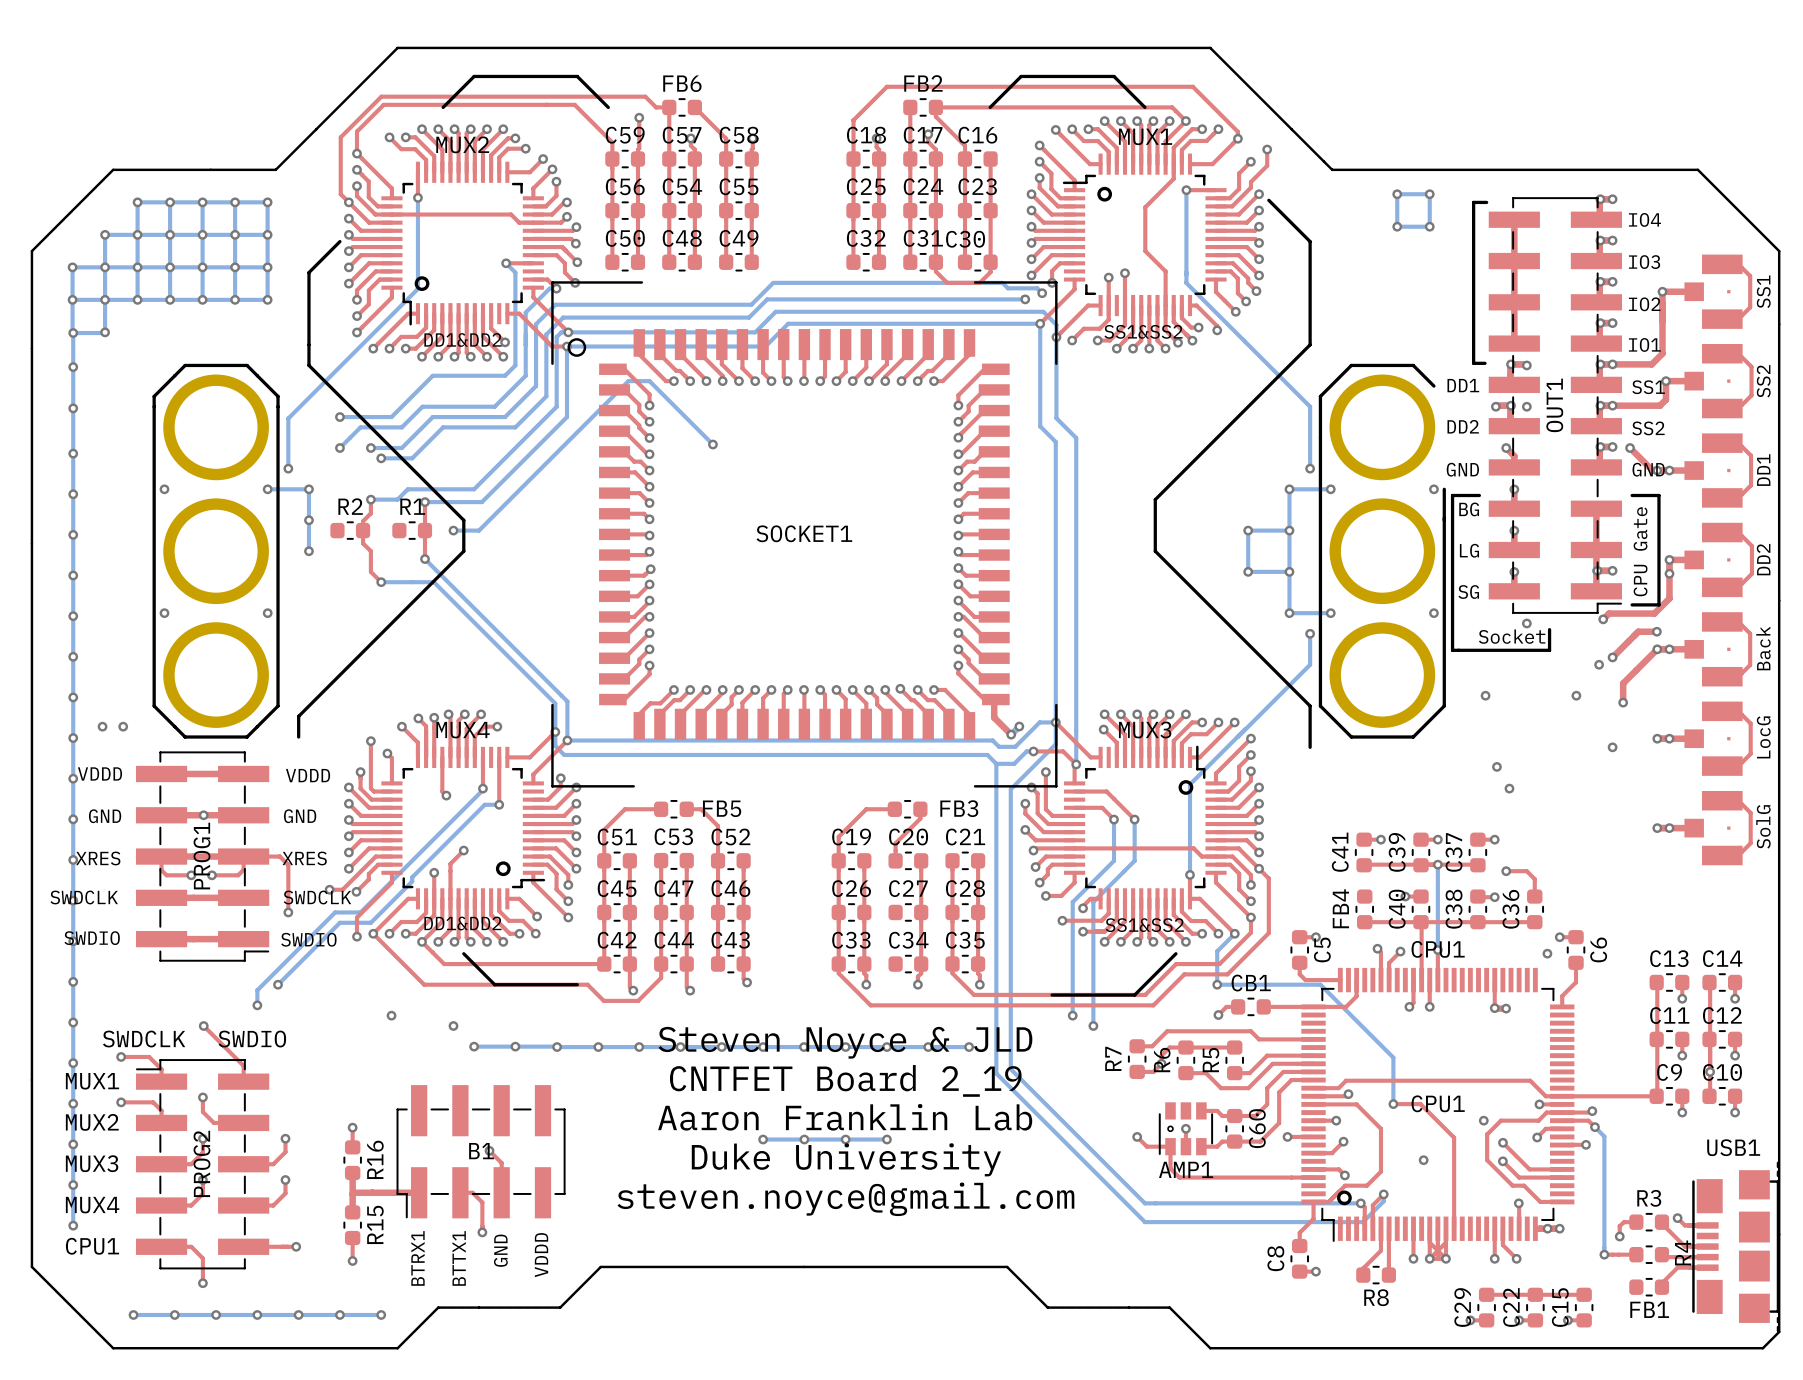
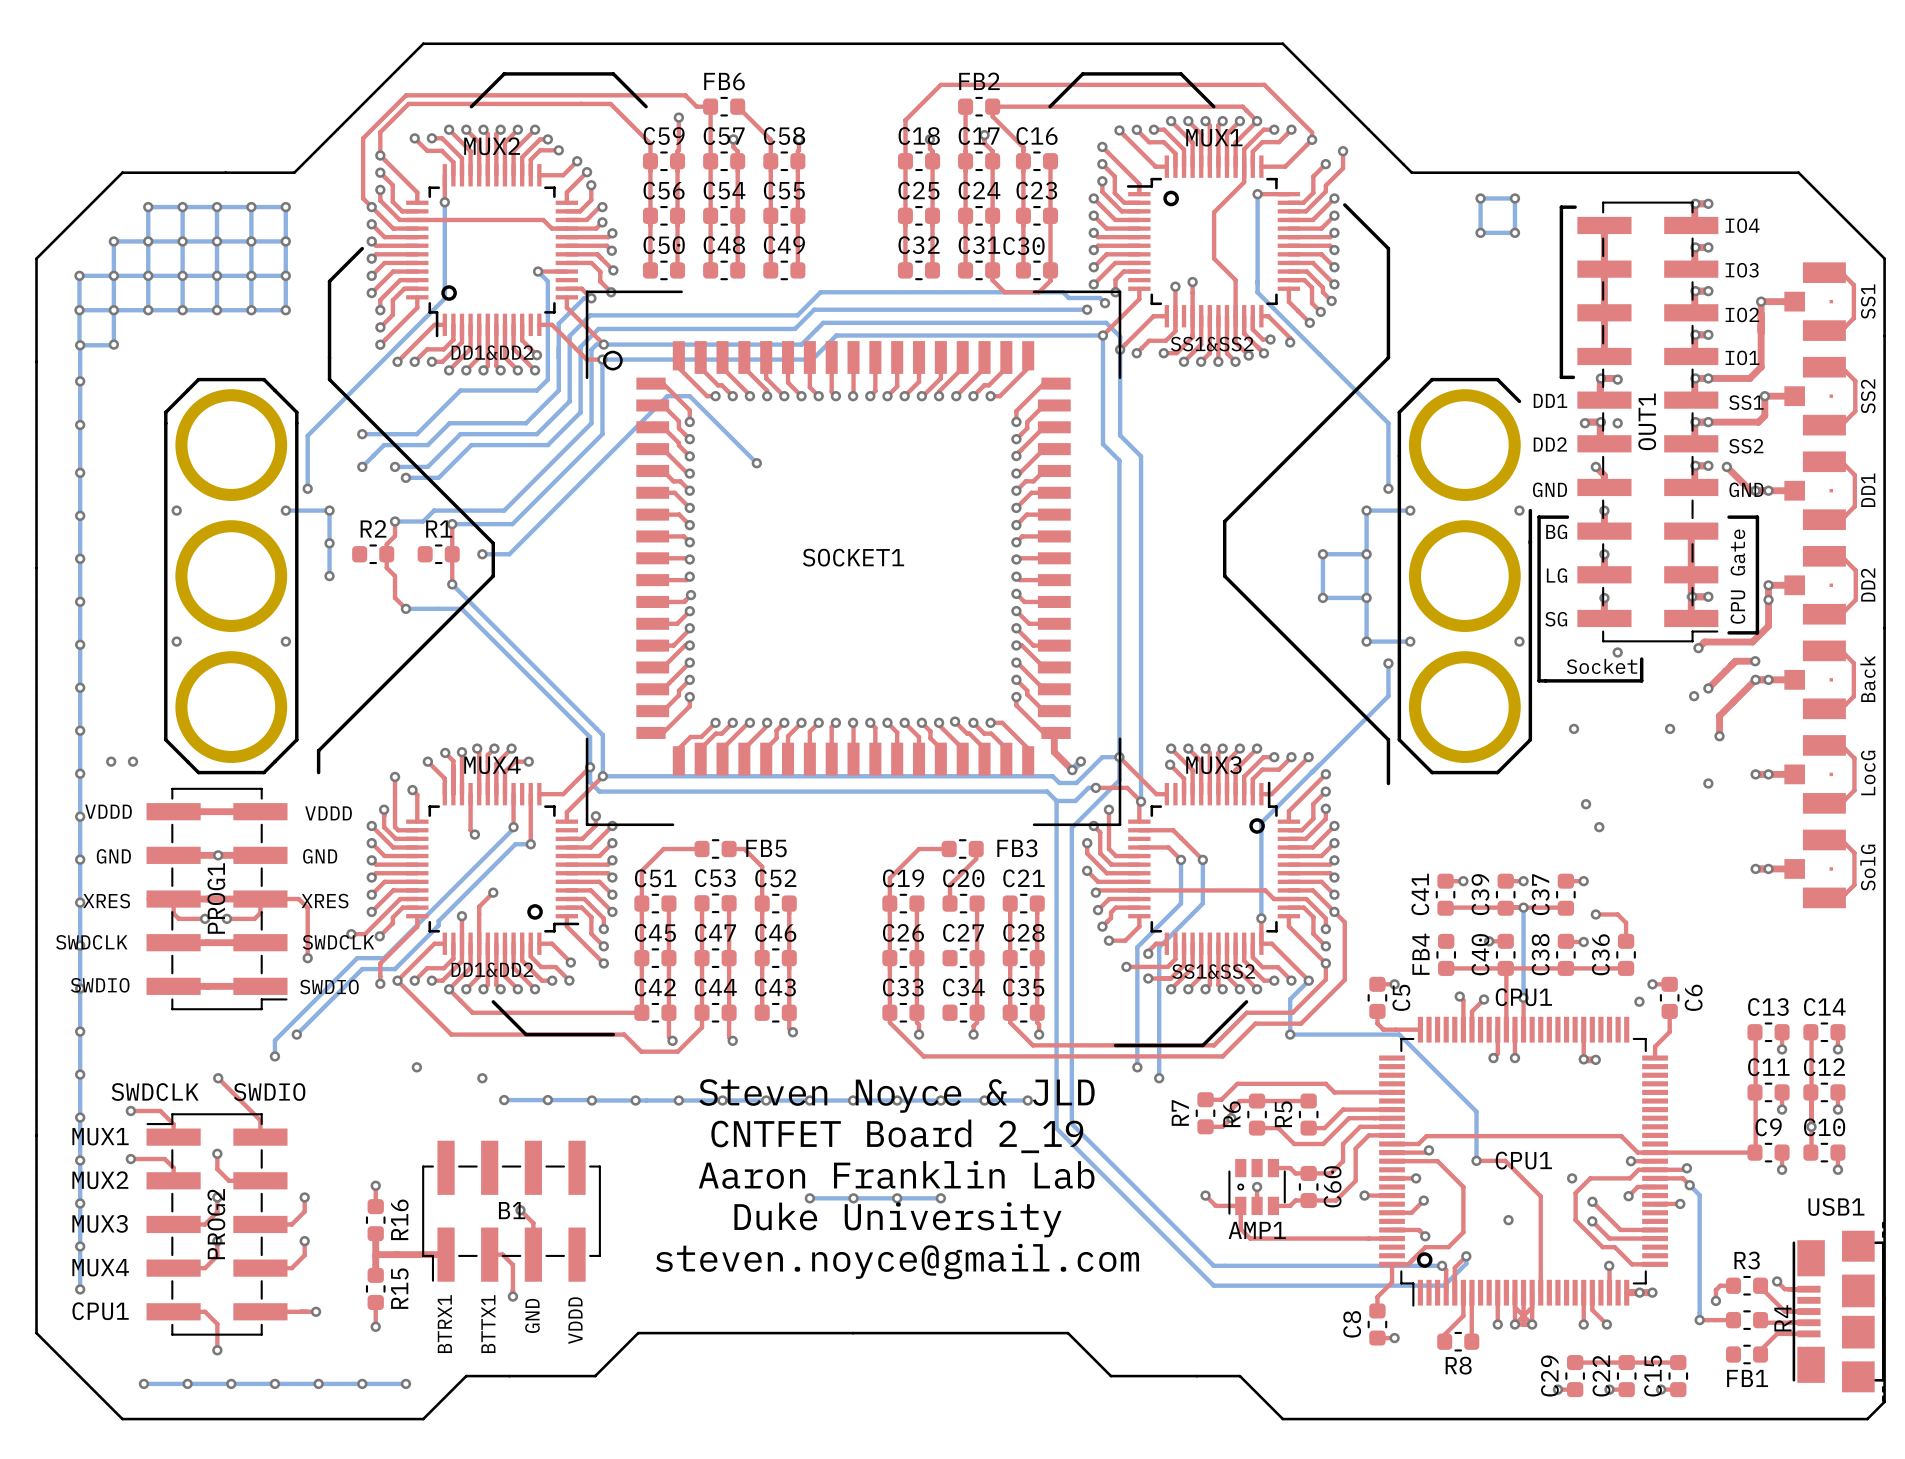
top track: (1356, 980) (1356, 996) (1346, 1006) (1263, 1006) -> none
top track: (1238, 1006) (1226, 1006) (1218, 1015) -> none
CB1: (1250, 1006) -> none
via: (1218, 1015) -> none

